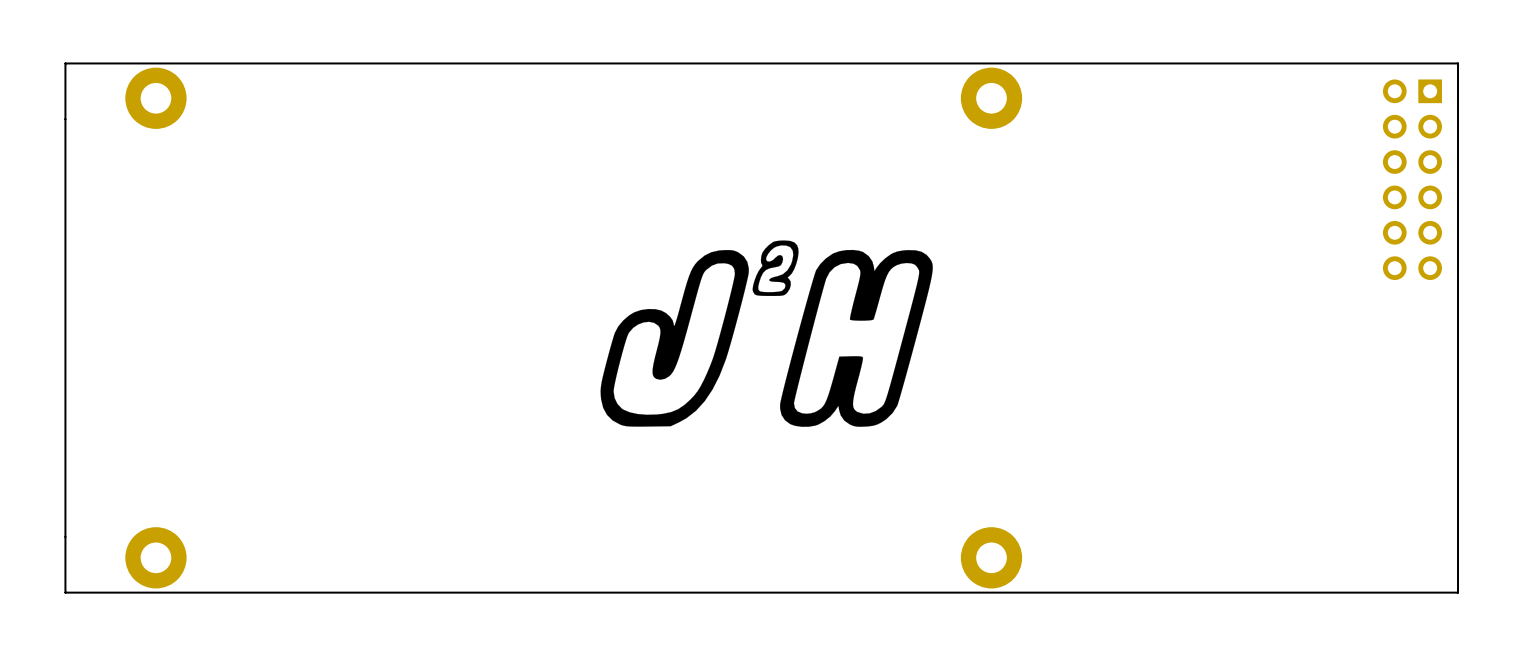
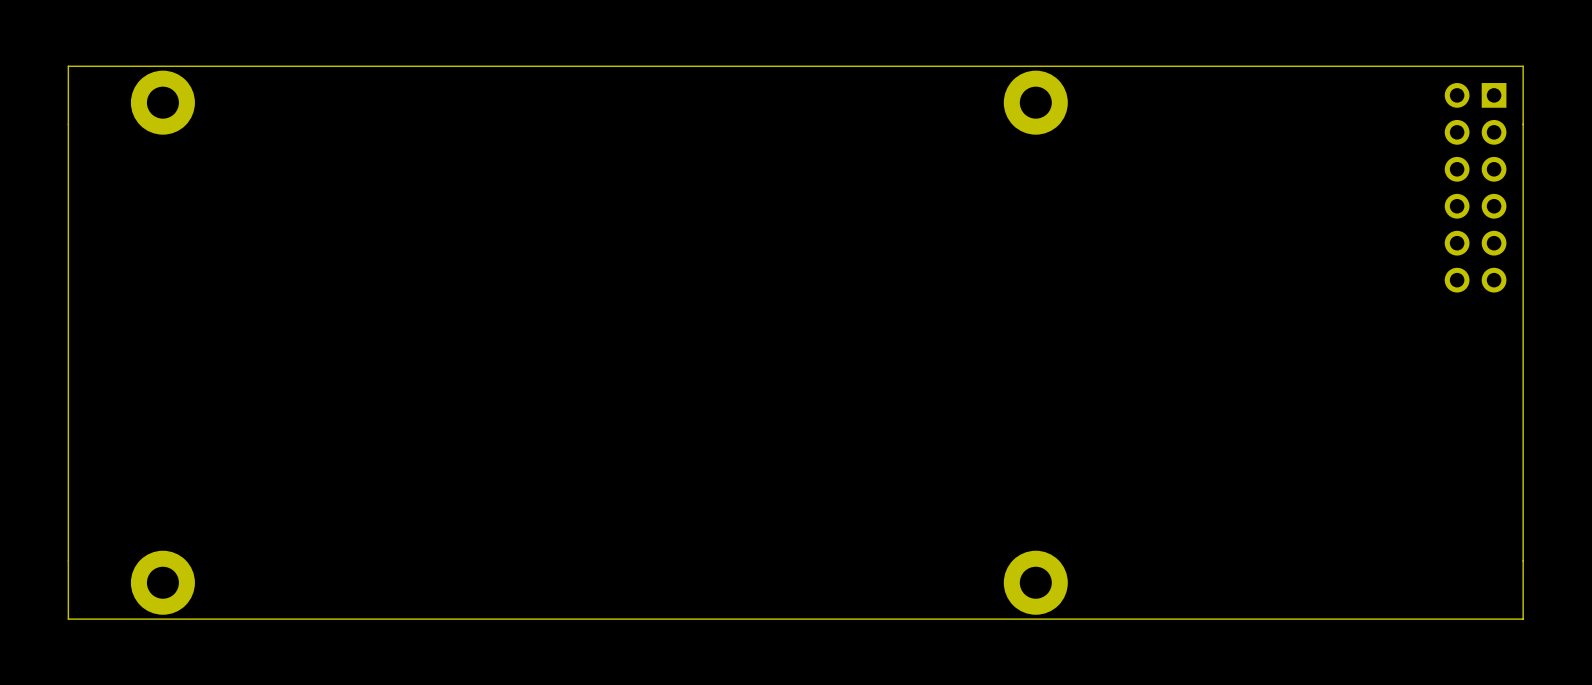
drawing: [600, 240, 933, 427] -> none

